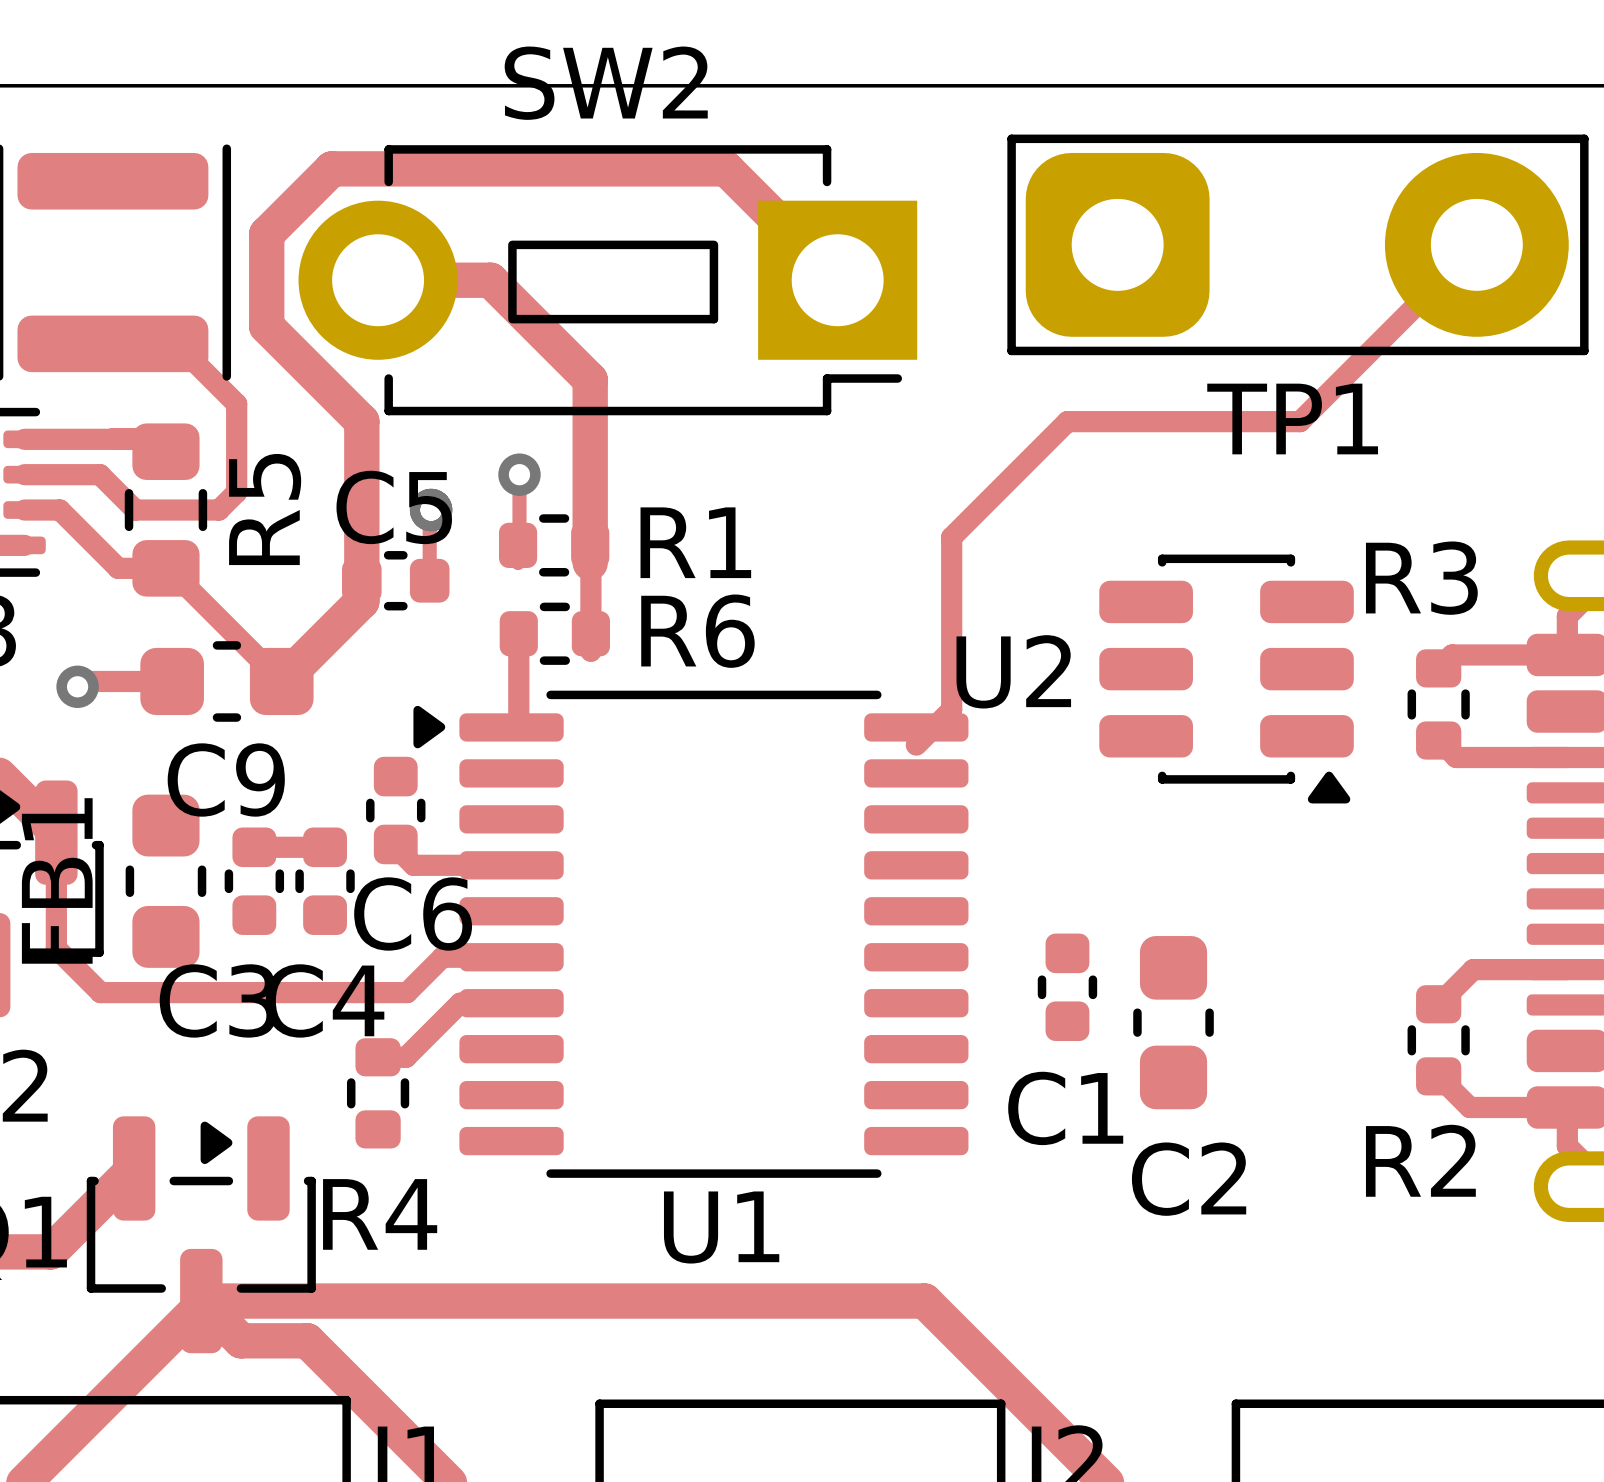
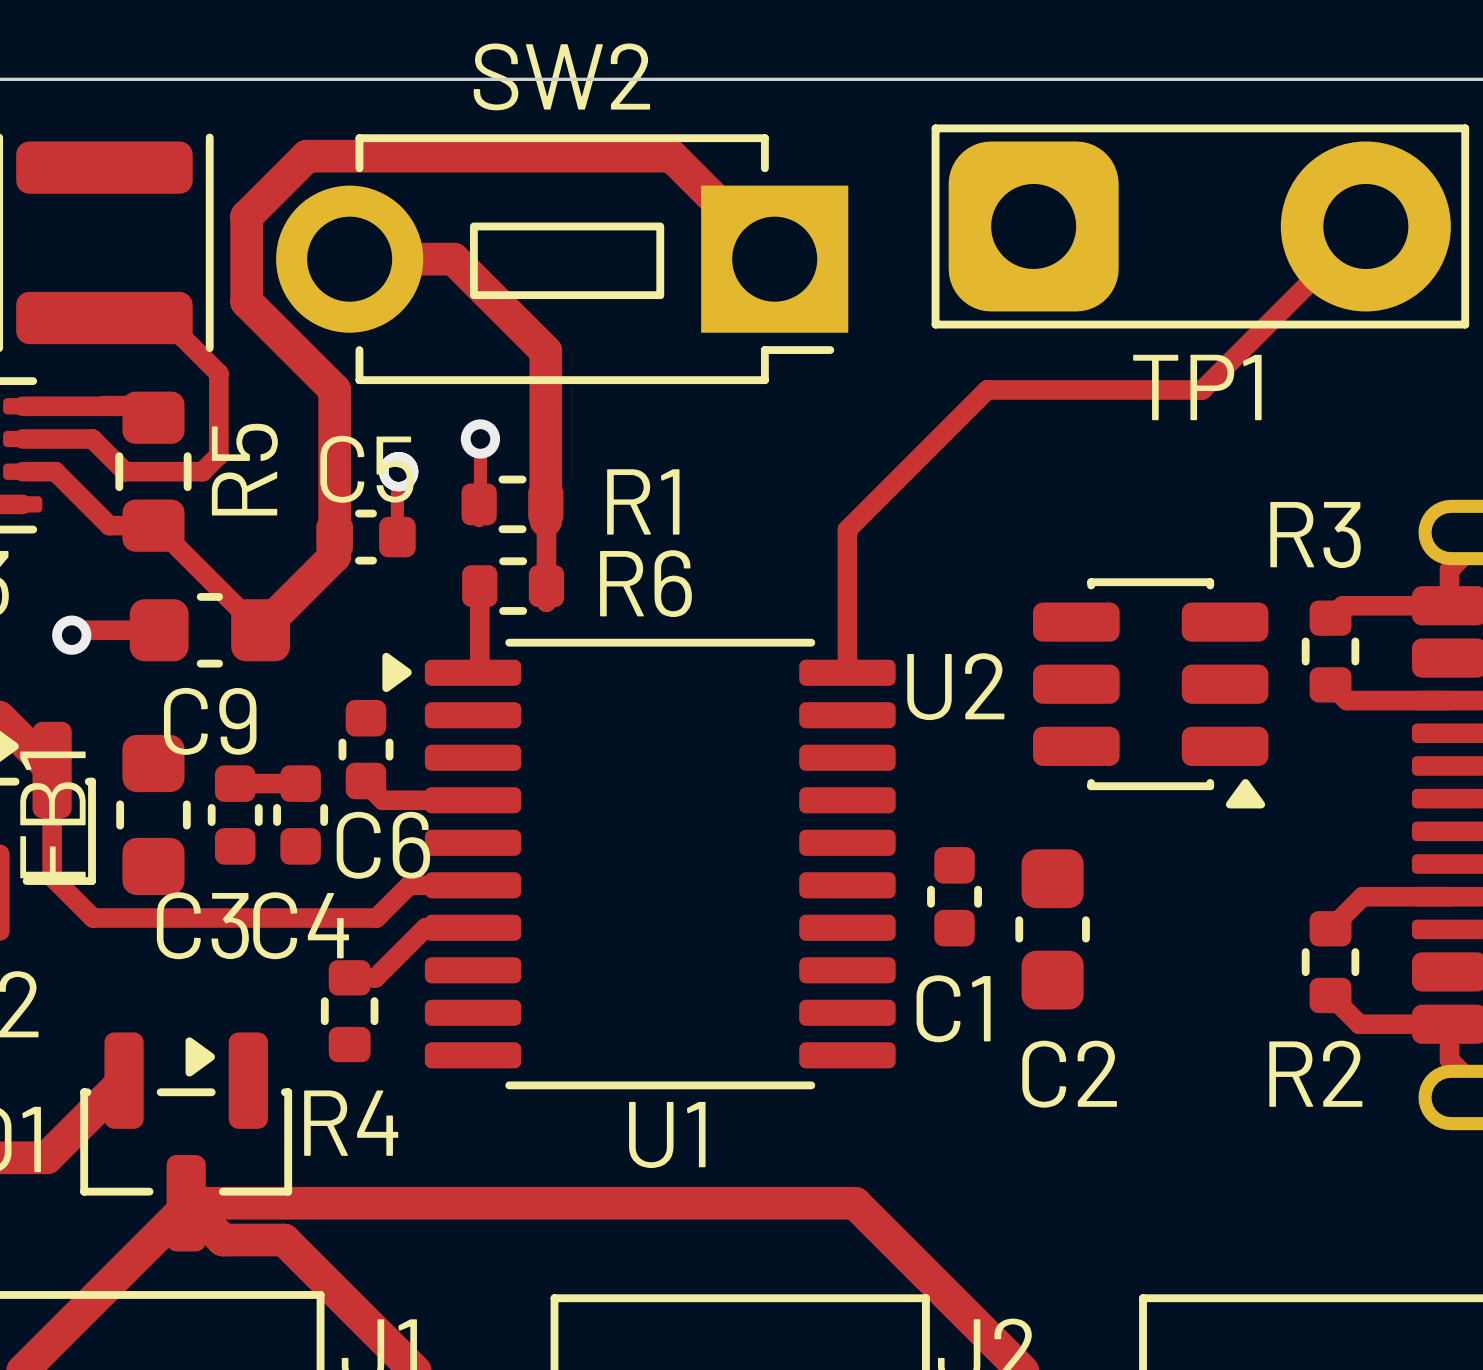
top track: (951, 537) (951, 709) (916, 745) -> (880, 497) (847, 529) (847, 672)
U2 position: (1226, 679) -> (1150, 693)
C1 position: (1067, 987) -> (954, 896)
C2 position: (1173, 1022) -> (1052, 929)

